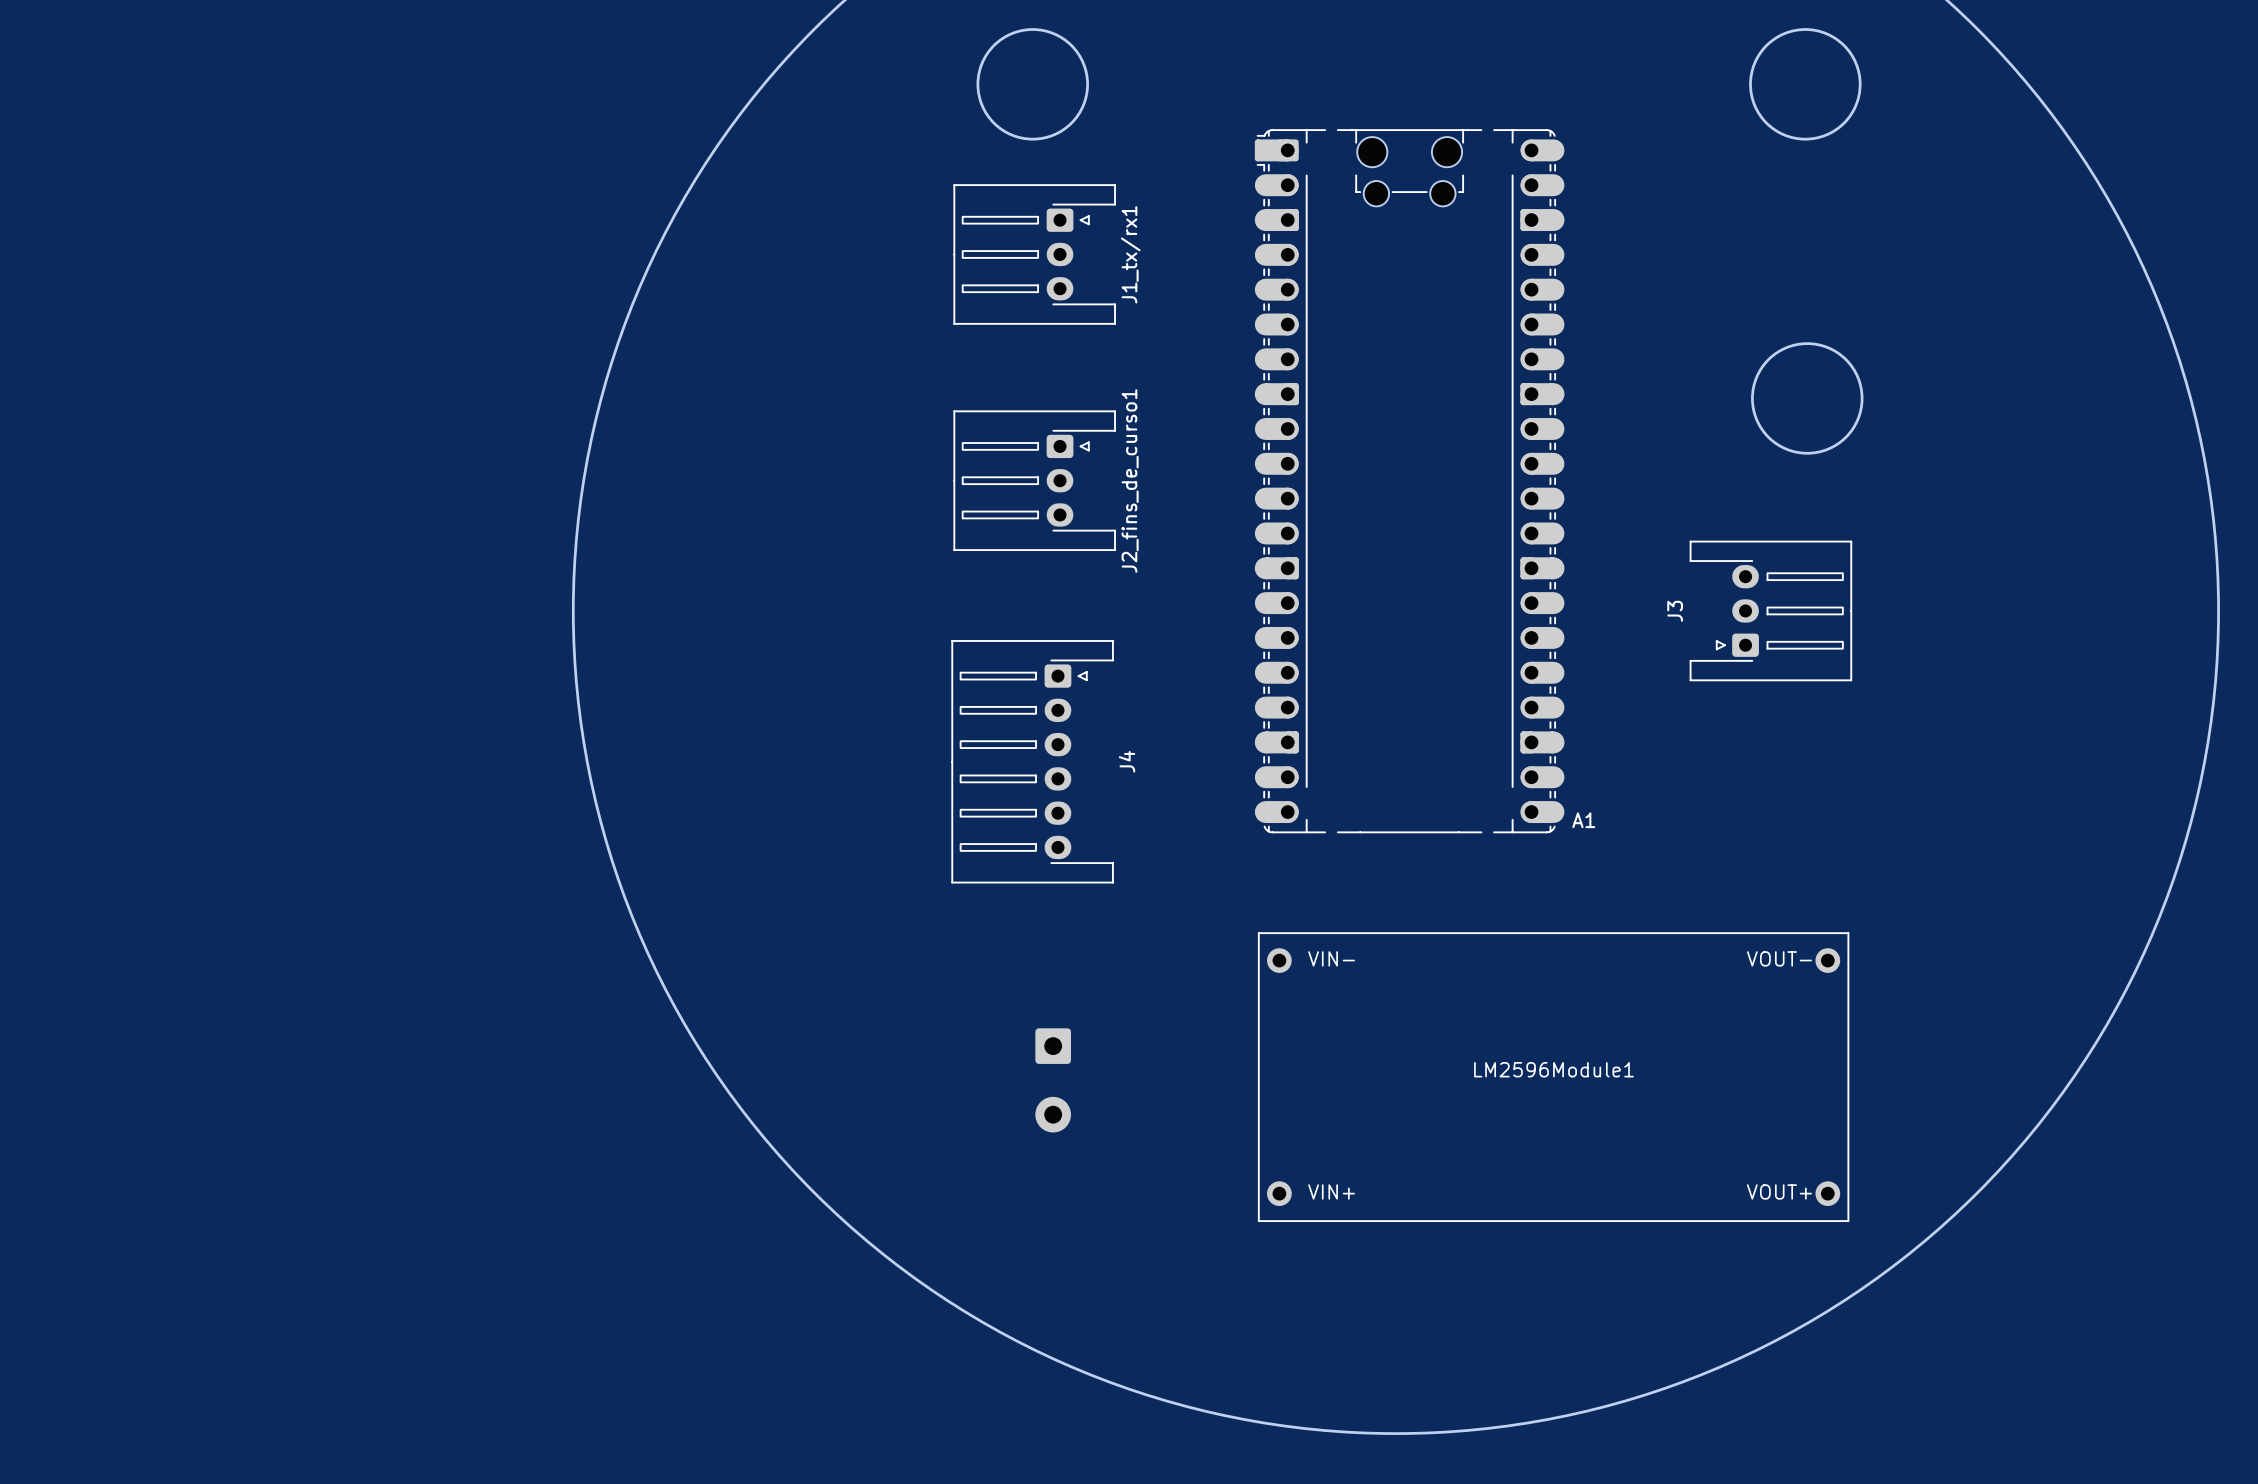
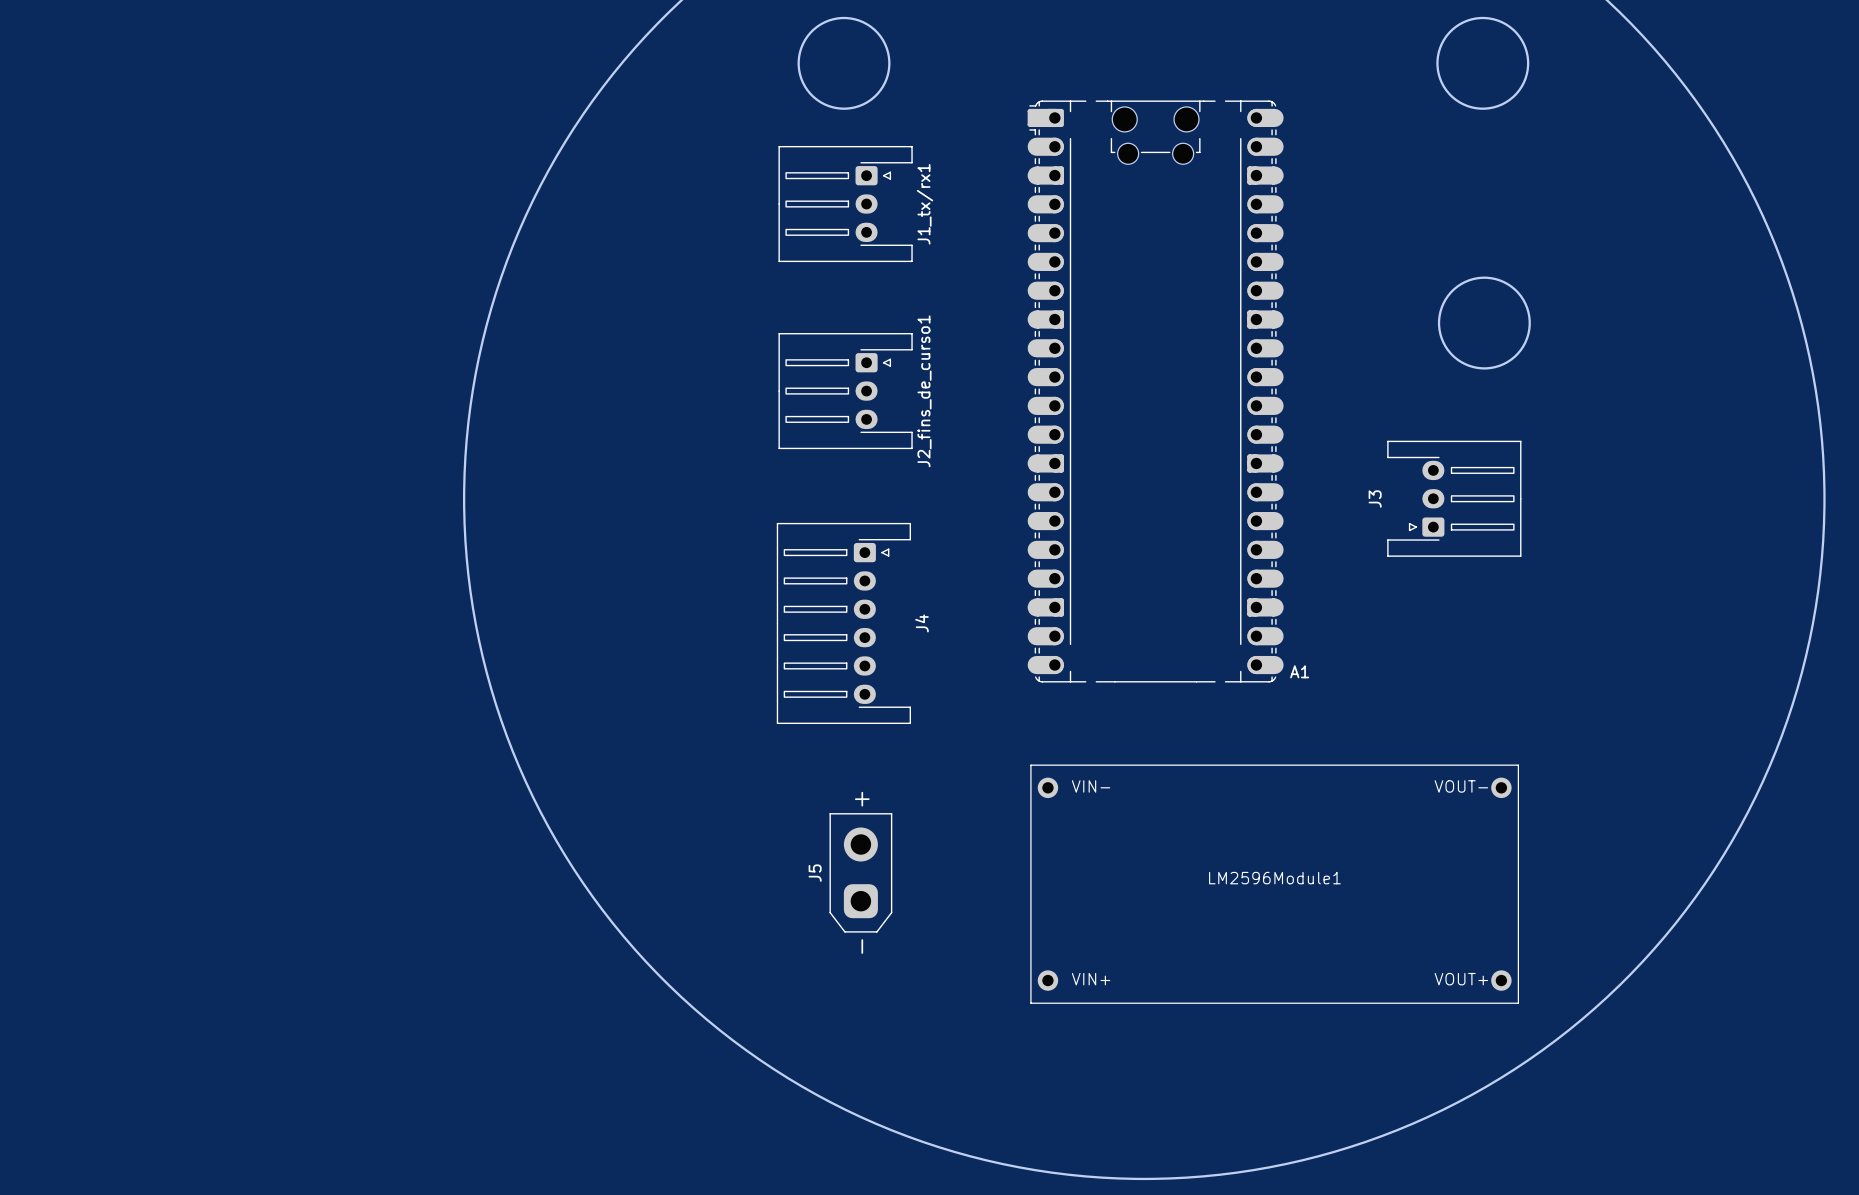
J5: none -> (860, 872)
part: (1053, 1080) -> none

